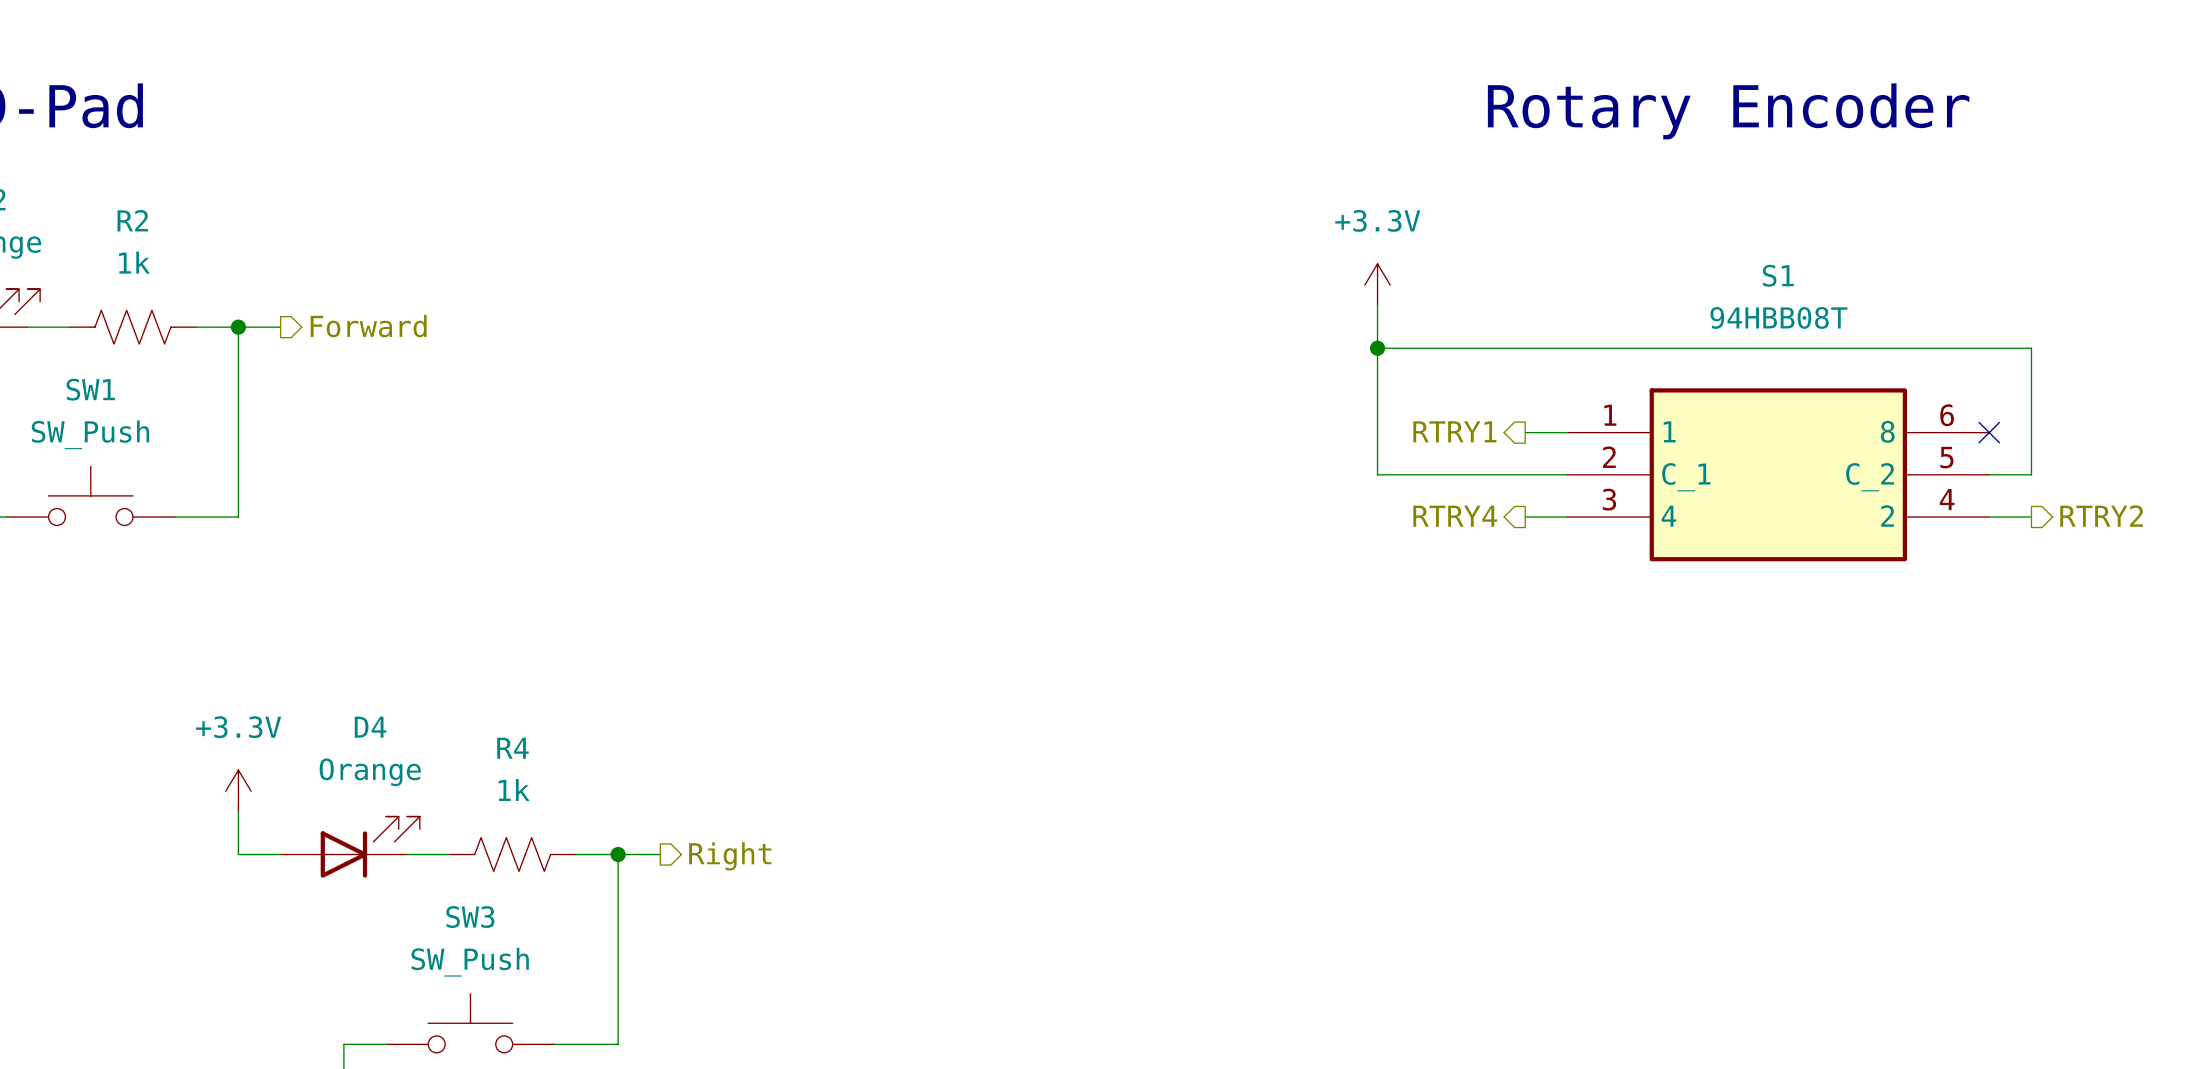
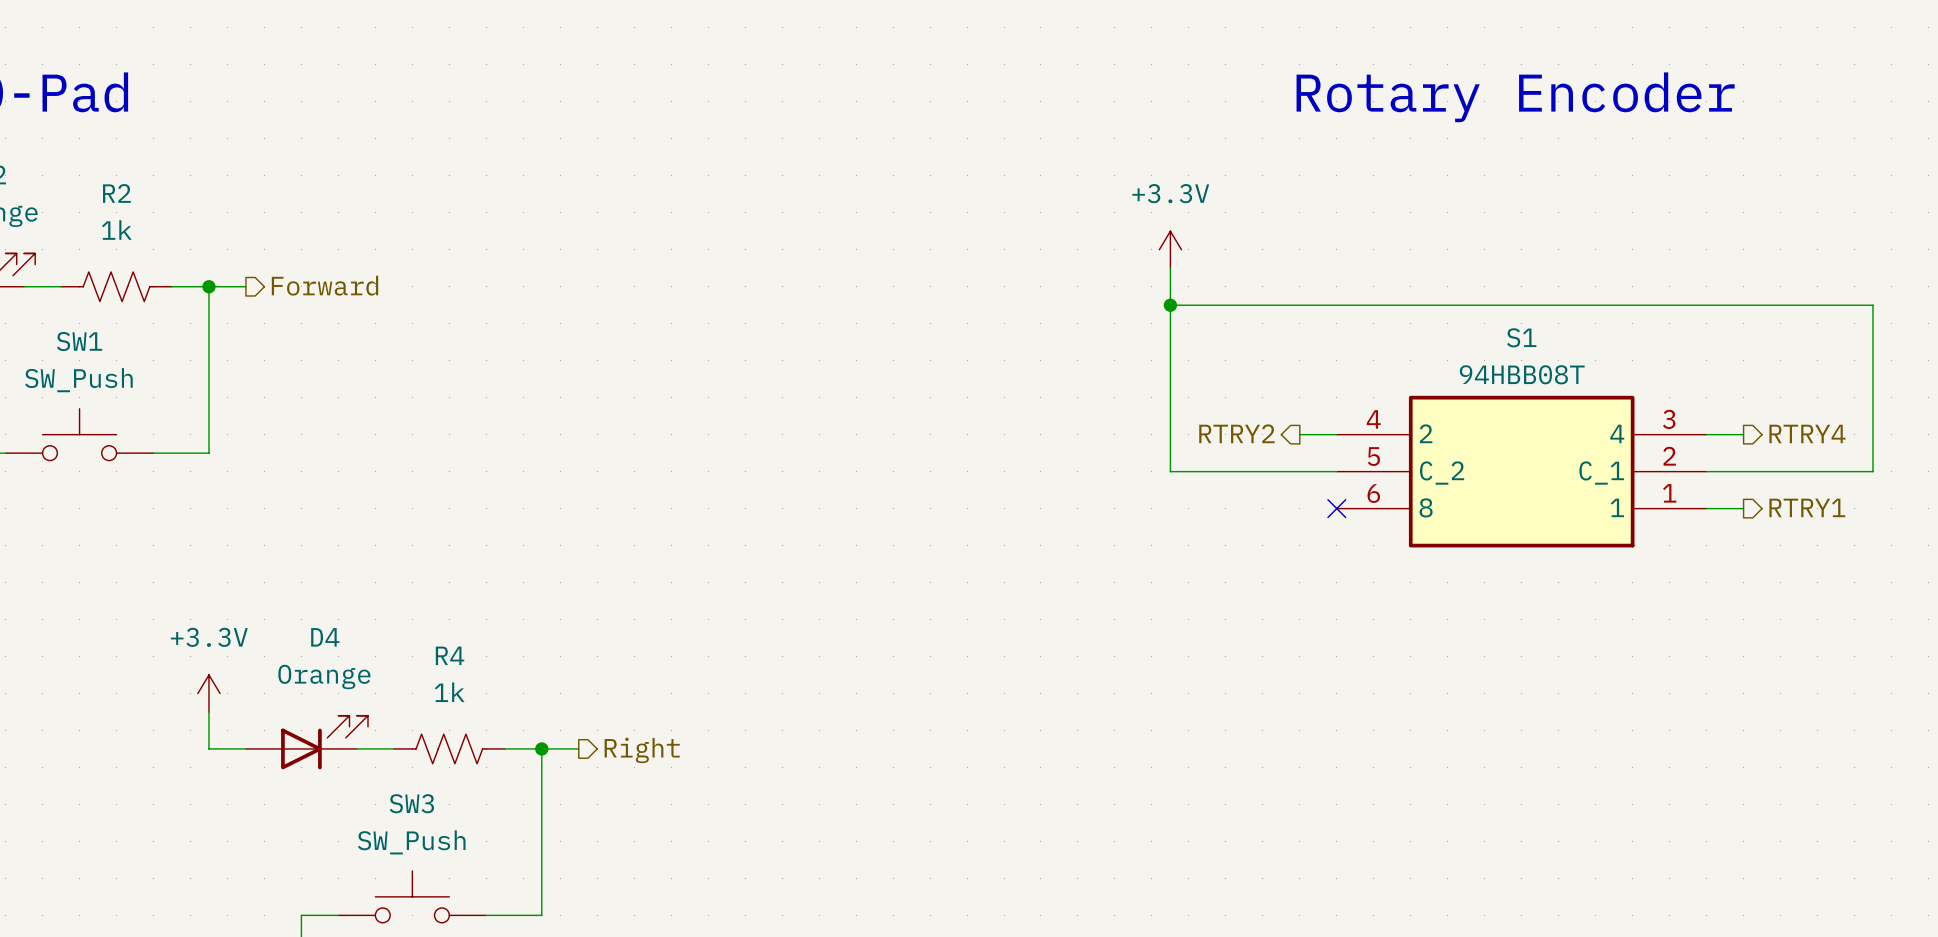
S1 name position: S1 (1778, 275) -> S1 (1521, 337)
power symbol position: +3.3V (1377, 284) -> +3.3V (1170, 249)
wire: none -> (1170, 268) (1170, 471) (1336, 471)
wire: (1377, 306) (1377, 474) (1567, 474) -> none
S1 value position: 94HBB08T (1778, 317) -> 94HBB08T (1522, 374)
junction position: (1377, 348) -> (1170, 305)
wire: (2031, 348) (2031, 474) (1989, 474) -> (1780, 305) (1872, 305) (1872, 471) (1706, 471)
hierarchical label: RTRY1 (1454, 431) -> none
wire: (1525, 432) (1567, 432) -> (1170, 305) (1207, 305)
no-connect mark: (1989, 432) -> none
S1 rotation: 0° (1778, 474) -> 180° (1521, 471)
hierarchical label: RTRY4 (1455, 516) -> RTRY2 (1236, 433)
hierarchical label: RTRY2 (2101, 516) -> RTRY4 (1807, 433)
wire: (1525, 517) (1567, 517) -> (1299, 434) (1336, 434)
wire: (1989, 517) (2031, 517) -> (1706, 434) (1743, 434)
hierarchical label: none -> RTRY1 (1807, 507)
no-connect mark: none -> (1336, 508)
wire: none -> (1706, 508) (1743, 508)

